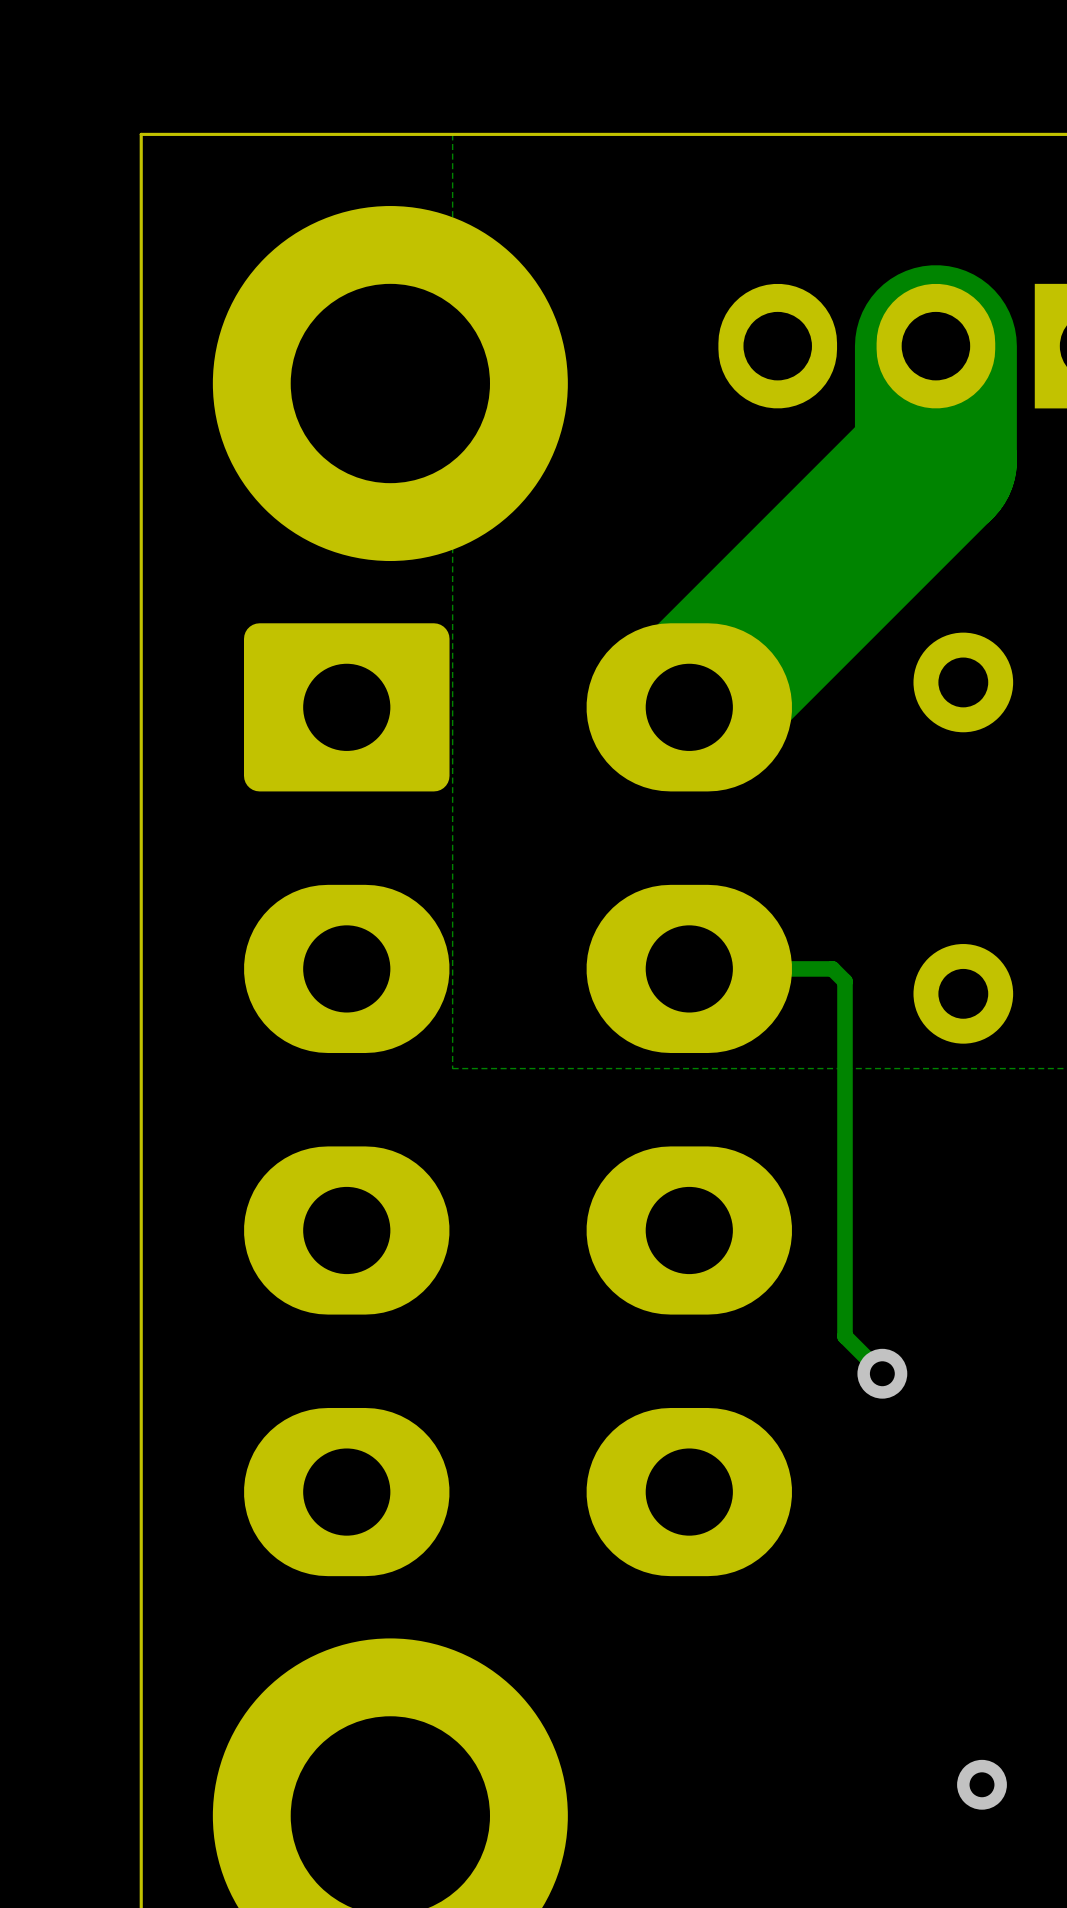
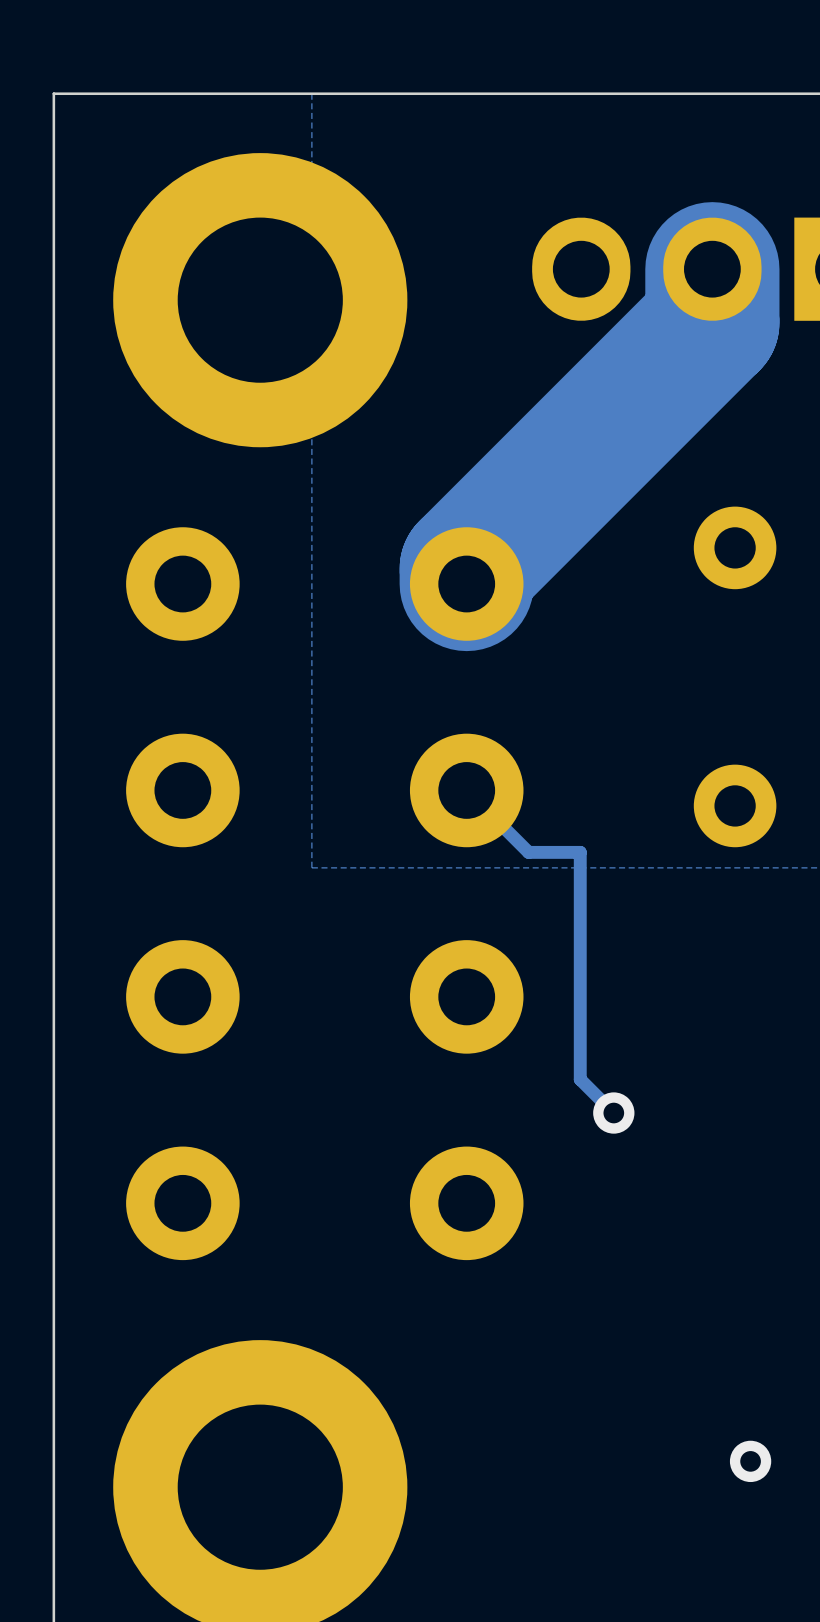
track: (935, 410) (935, 460) (689, 707) -> (712, 322) (466, 568) (466, 584)
part: none -> (182, 584)
part: none -> (466, 584)
track: (689, 968) (832, 968) (844, 981) (844, 1336) (882, 1373) -> none
part: none -> (182, 790)
track: none -> (466, 790) (528, 852) (580, 852) (580, 1079) (613, 1113)
part: none -> (466, 790)
part: (518, 1099) -> none
part: none -> (182, 996)
part: none -> (466, 996)
via position: (882, 1373) -> (613, 1113)
part: none -> (182, 1203)
part: none -> (466, 1203)

